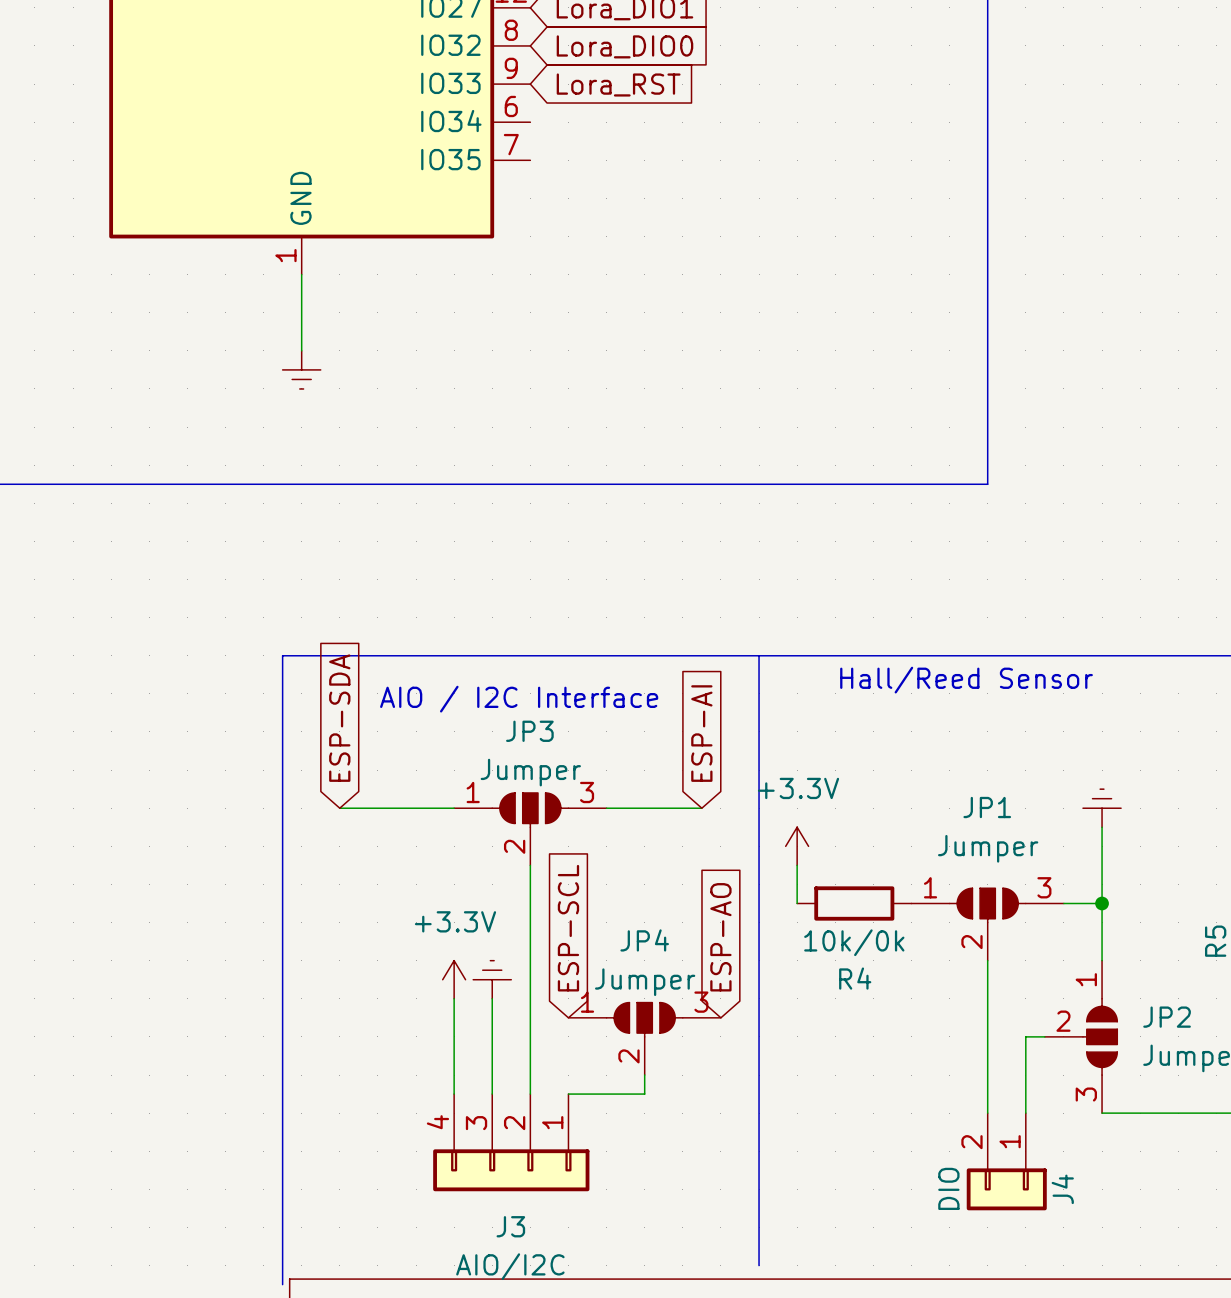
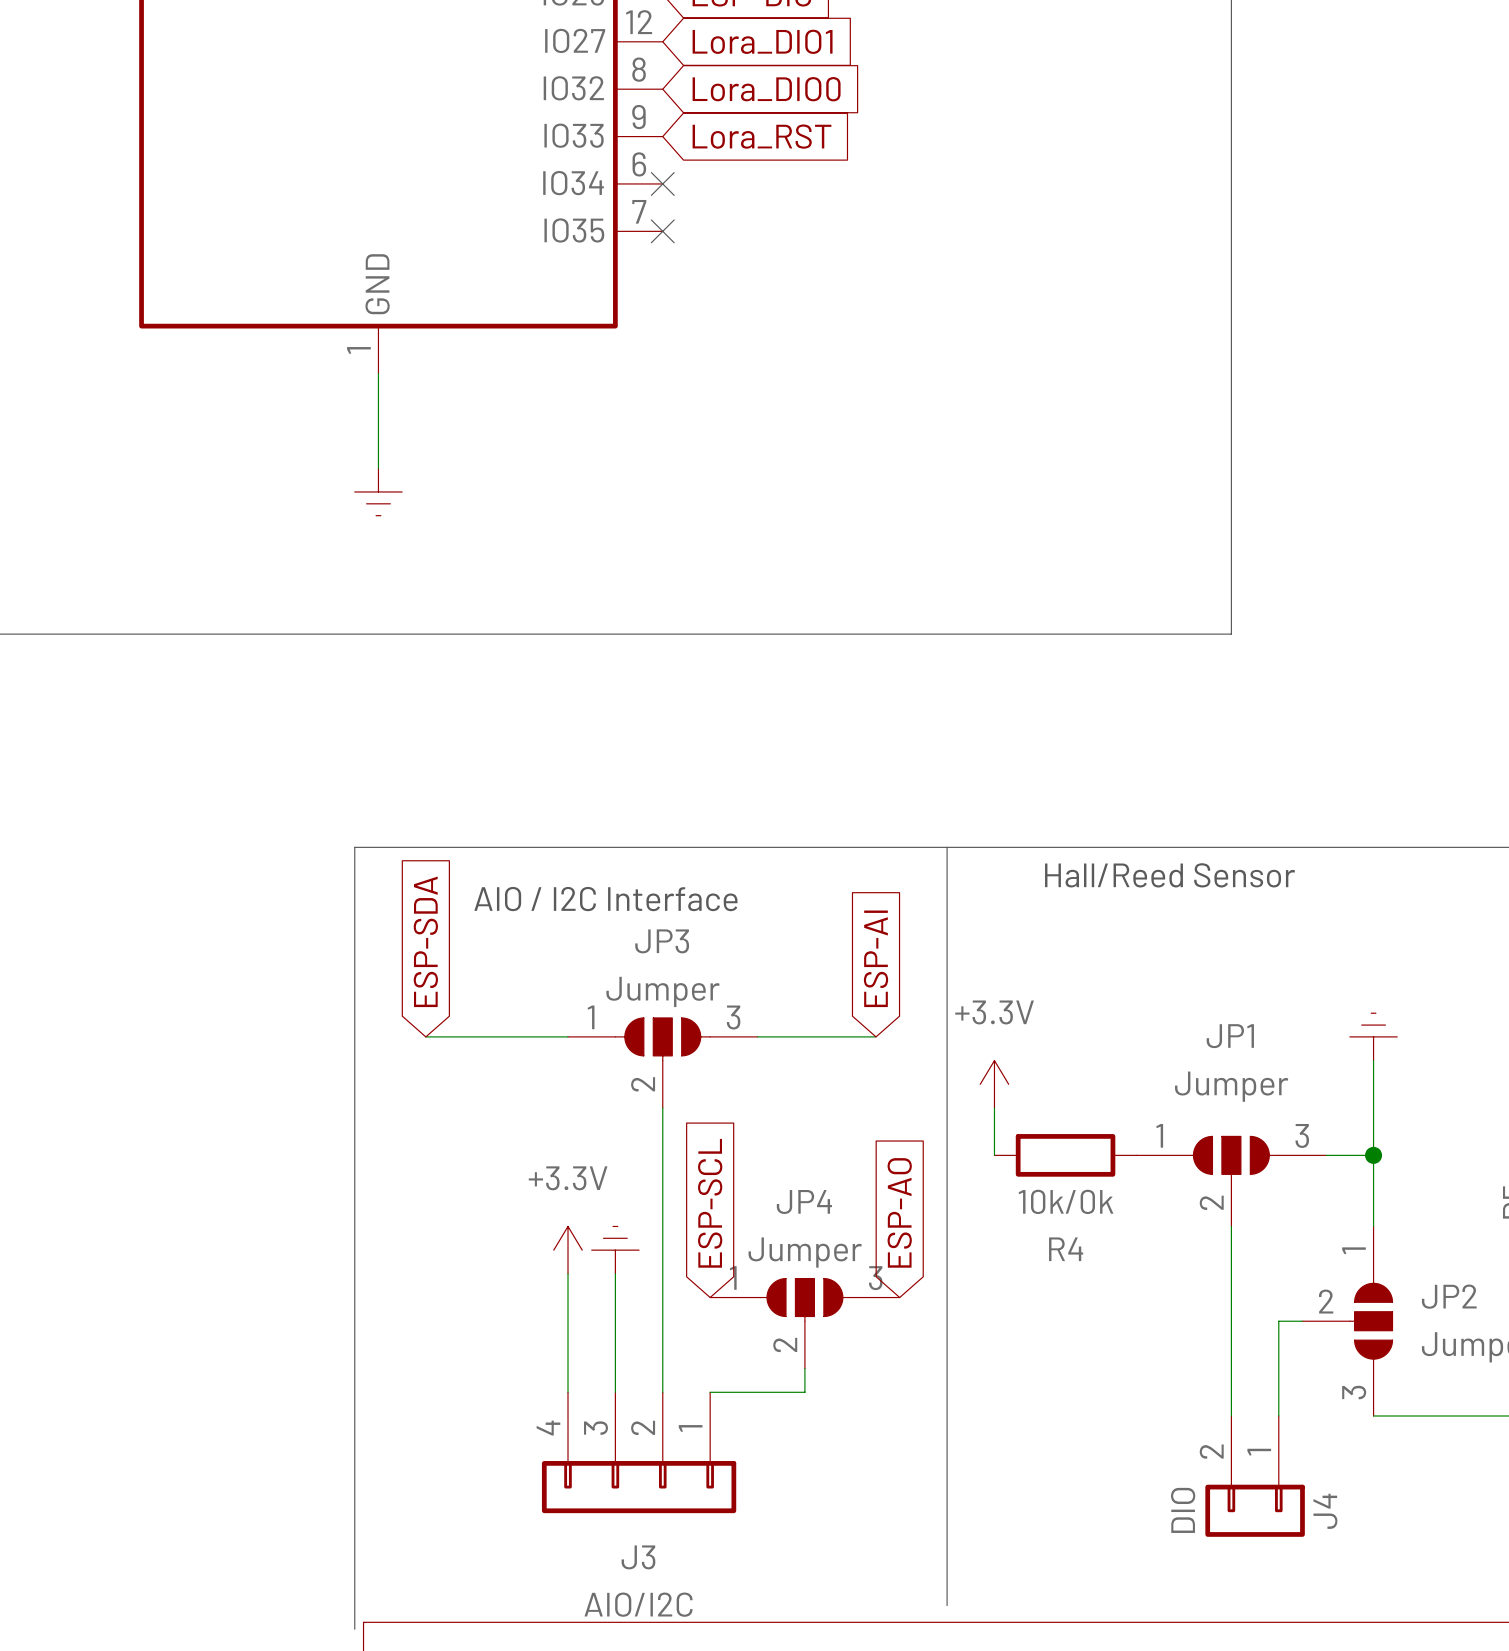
no-connect mark: none -> (662, 183)
no-connect mark: none -> (662, 231)

